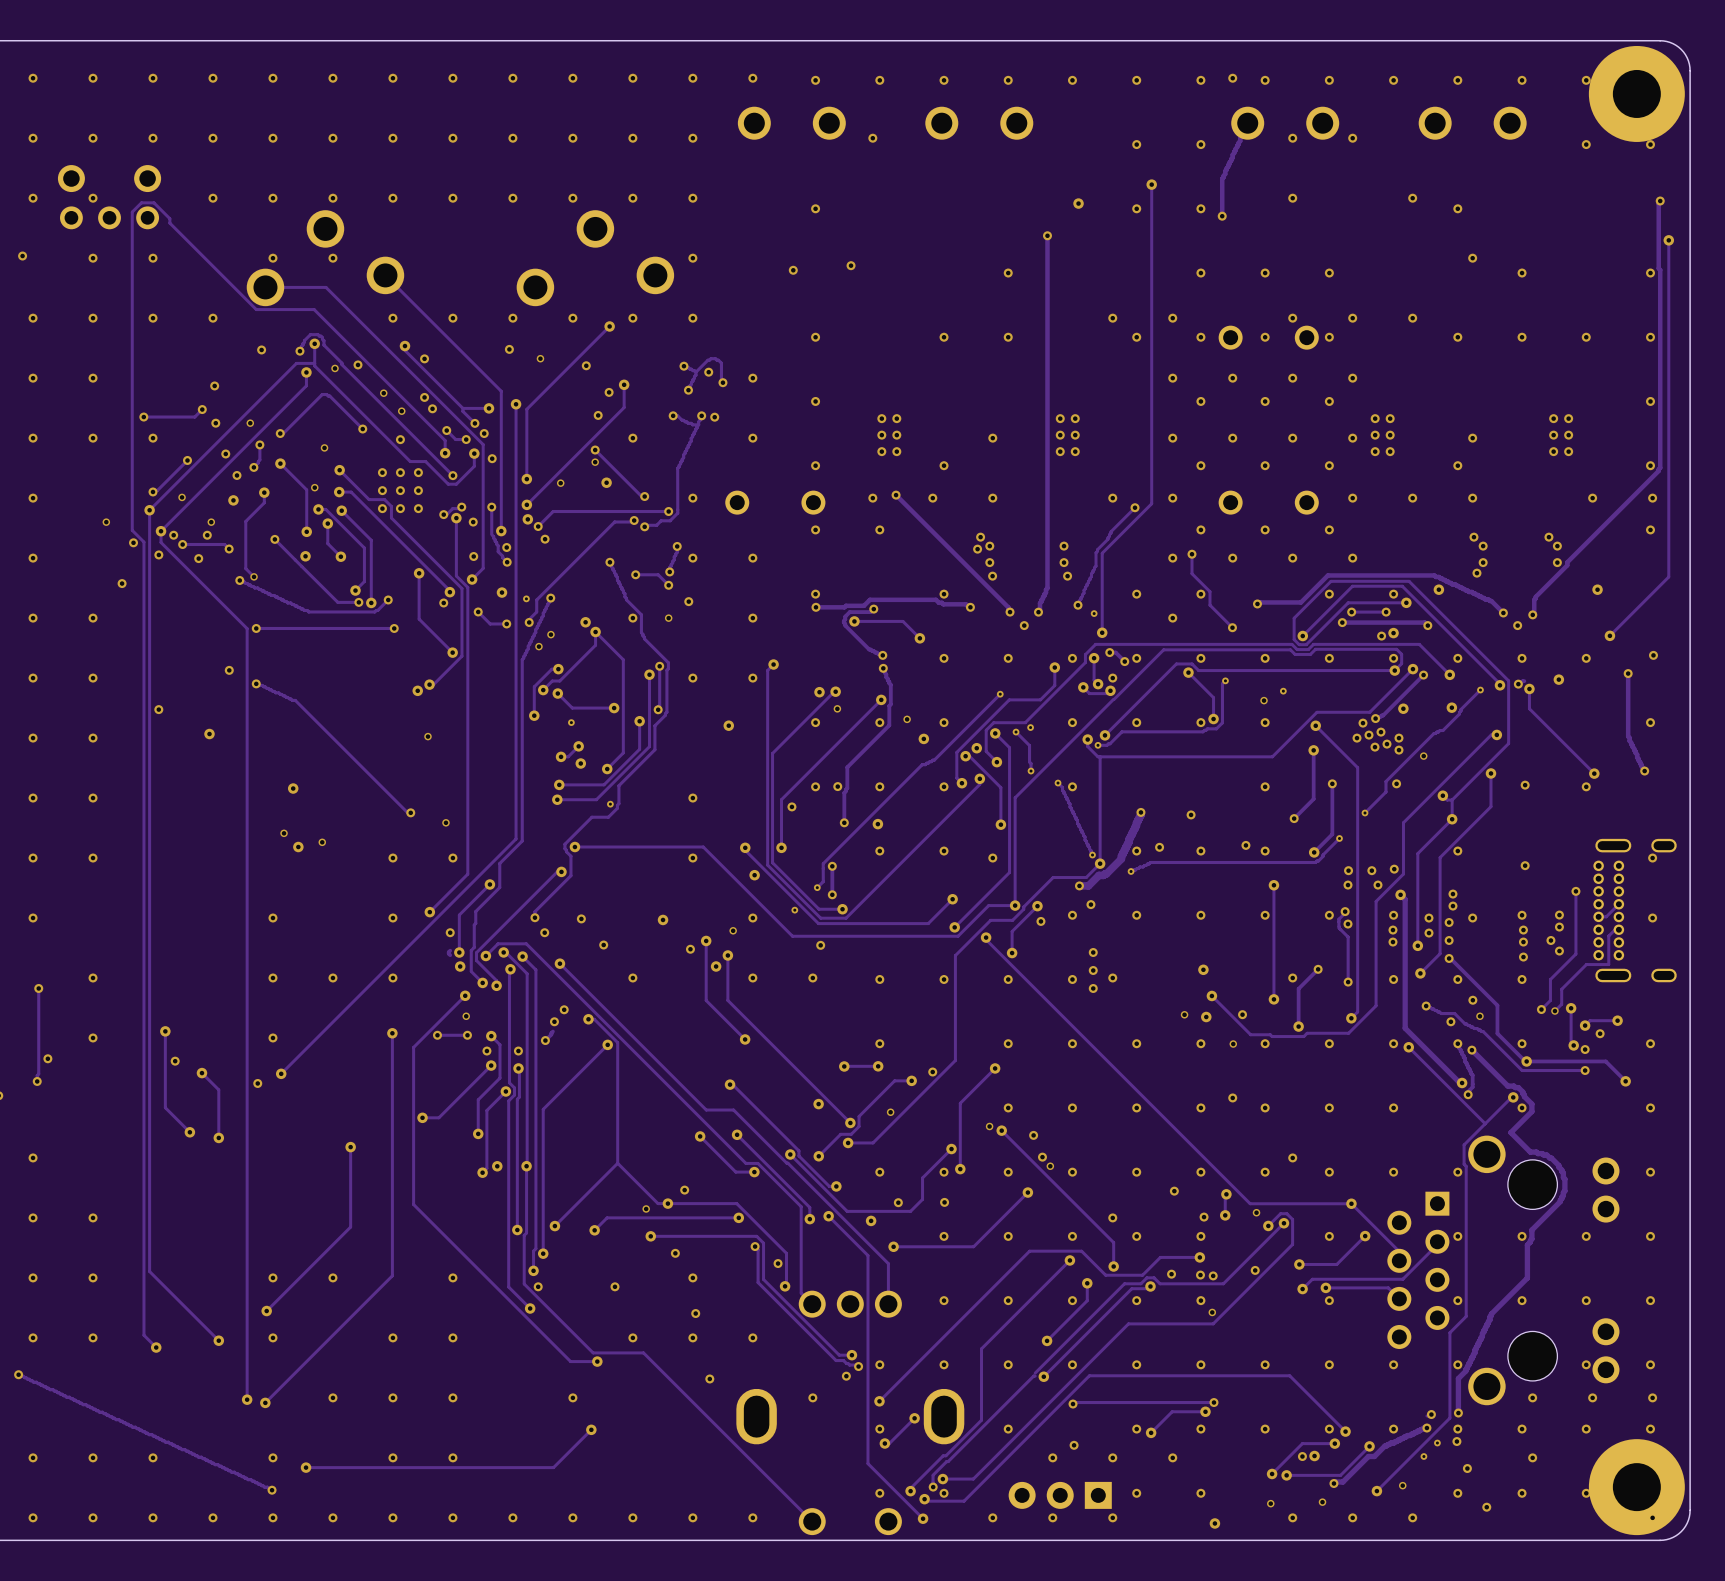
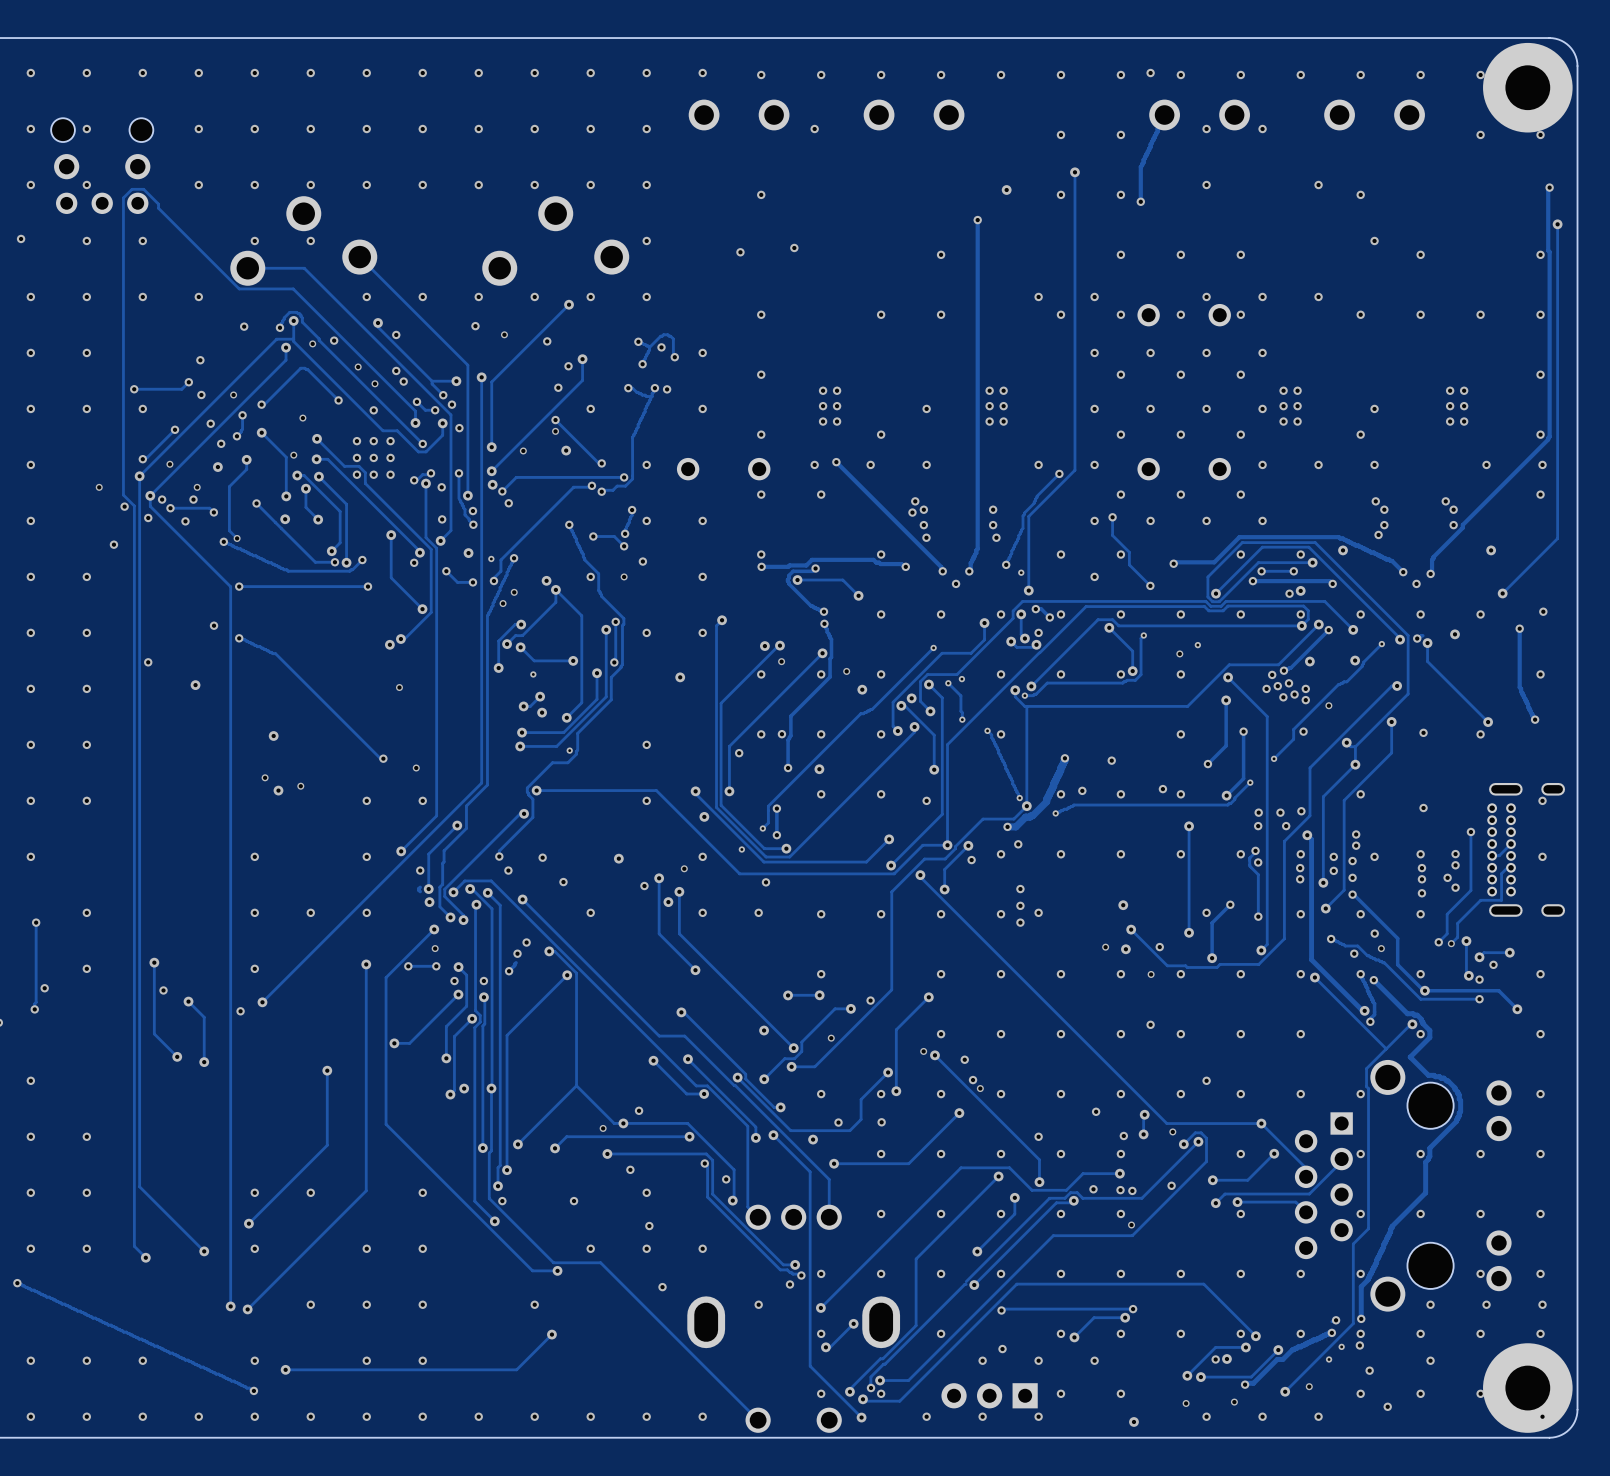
via: (153, 138) -> none
part: none -> (102, 166)

